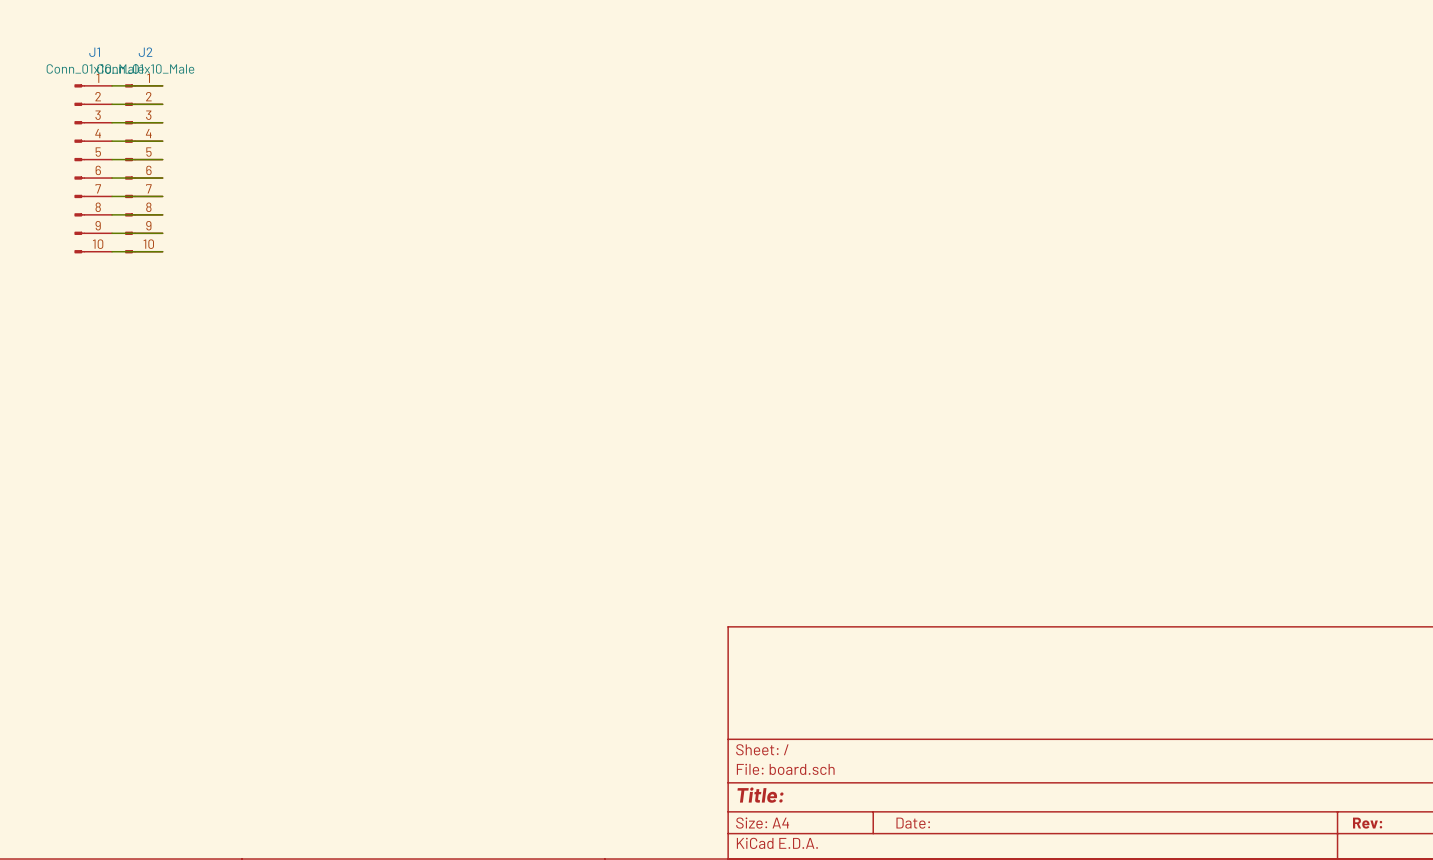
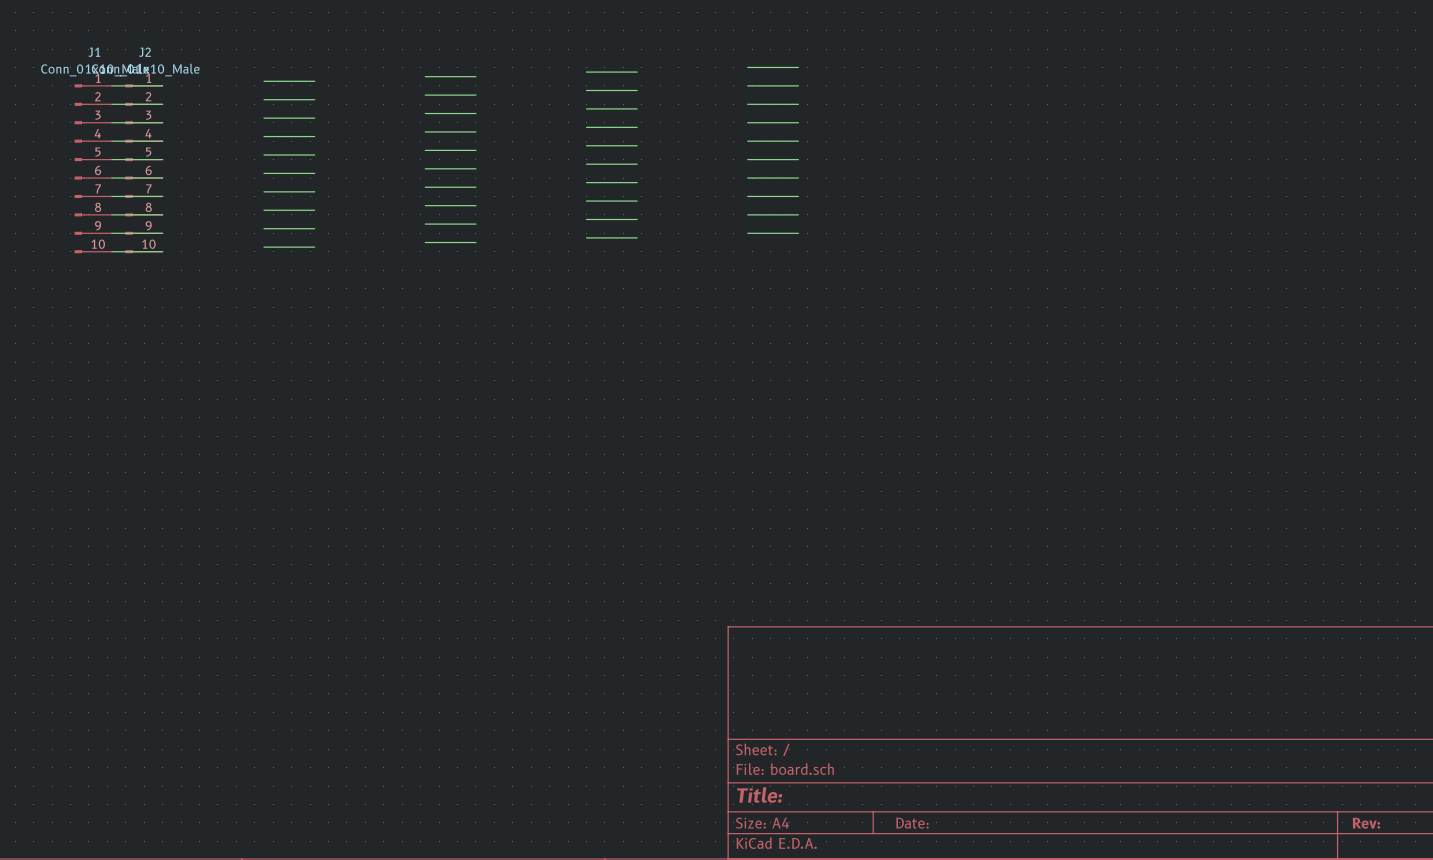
wire: none -> (747, 67) (798, 67)
wire: none -> (586, 72) (637, 72)
wire: none -> (425, 76) (475, 76)
wire: none -> (264, 81) (314, 81)
wire: none -> (747, 85) (798, 85)
wire: none -> (586, 90) (637, 90)
wire: none -> (425, 95) (475, 95)
wire: none -> (264, 99) (314, 99)
wire: none -> (747, 104) (798, 104)
wire: none -> (586, 108) (637, 108)
wire: none -> (425, 113) (475, 113)
wire: none -> (264, 118) (314, 118)
wire: none -> (747, 122) (798, 122)
wire: none -> (586, 127) (637, 127)
wire: none -> (425, 131) (475, 131)
wire: none -> (264, 136) (314, 136)
wire: none -> (747, 141) (798, 141)
wire: none -> (586, 145) (637, 145)
wire: none -> (425, 150) (475, 150)
wire: none -> (264, 154) (314, 154)
wire: none -> (747, 159) (798, 159)
wire: none -> (586, 164) (637, 164)
wire: none -> (425, 168) (475, 168)
wire: none -> (264, 173) (314, 173)
wire: none -> (747, 178) (798, 178)
wire: none -> (586, 182) (637, 182)
wire: none -> (425, 187) (475, 187)
wire: none -> (264, 191) (314, 191)
wire: none -> (747, 196) (798, 196)
wire: none -> (586, 201) (637, 201)
wire: none -> (425, 205) (475, 205)
wire: none -> (264, 210) (314, 210)
wire: none -> (747, 214) (798, 214)
wire: none -> (586, 219) (637, 219)
wire: none -> (425, 224) (475, 224)
wire: none -> (264, 228) (314, 228)
wire: none -> (747, 233) (798, 233)
wire: none -> (586, 237) (637, 237)
wire: none -> (425, 242) (475, 242)
wire: none -> (264, 247) (314, 247)

